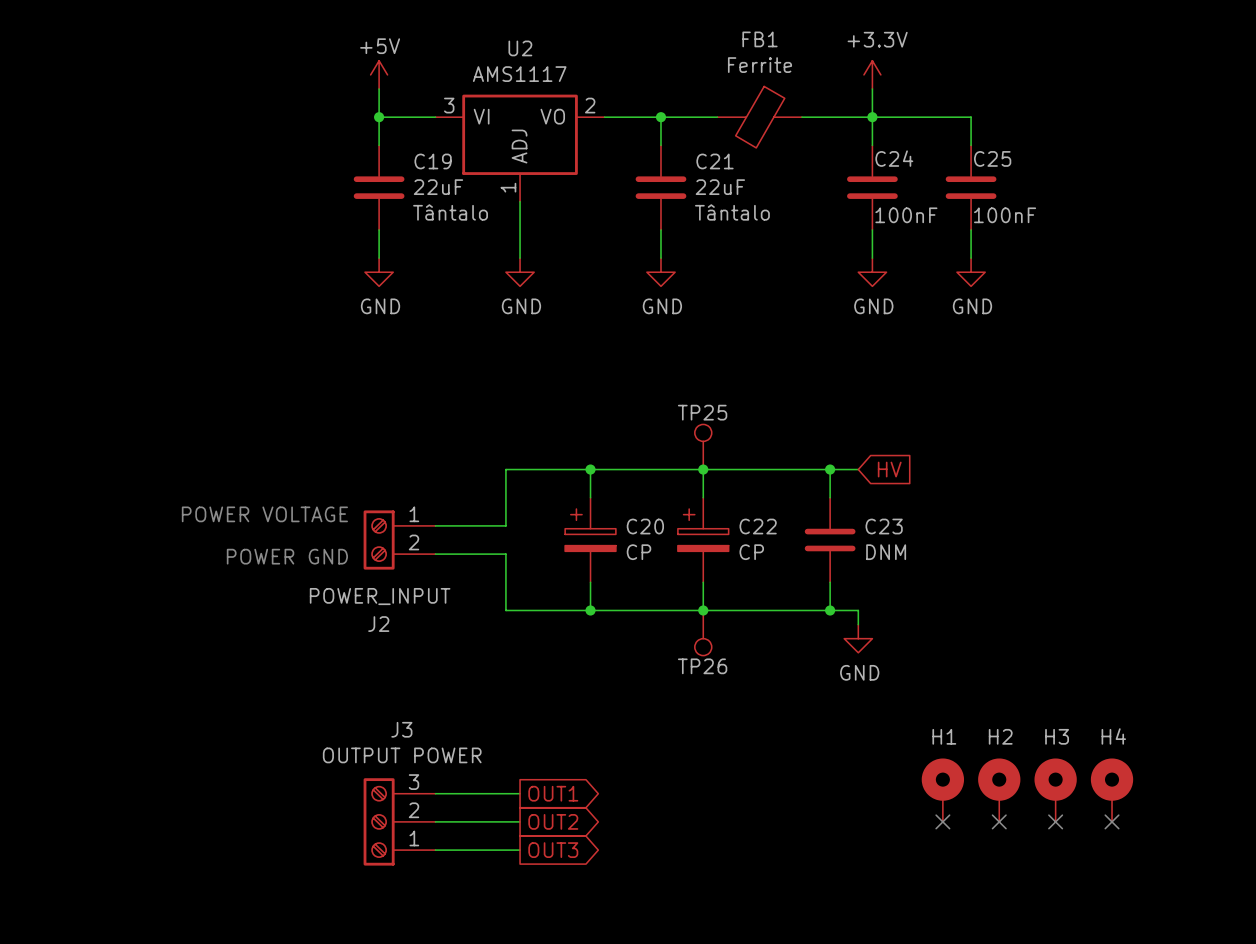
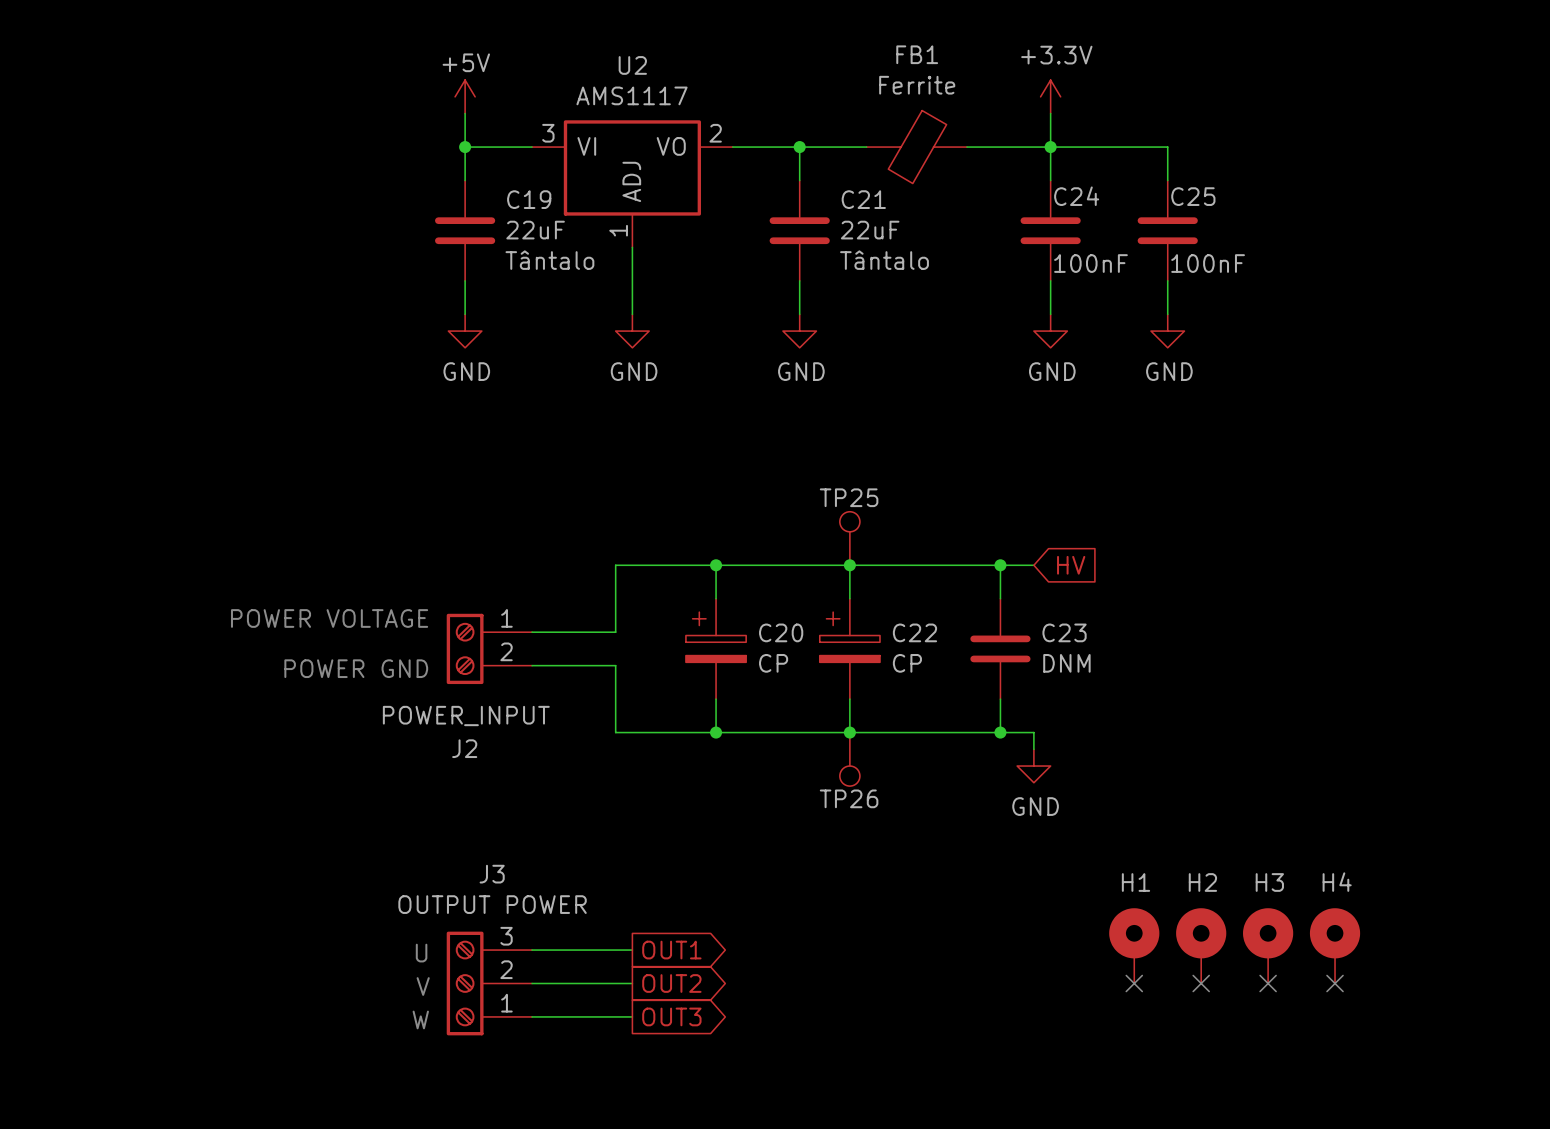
text: none -> U (421, 953)
text: none -> V (423, 986)
text: none -> W (420, 1019)

